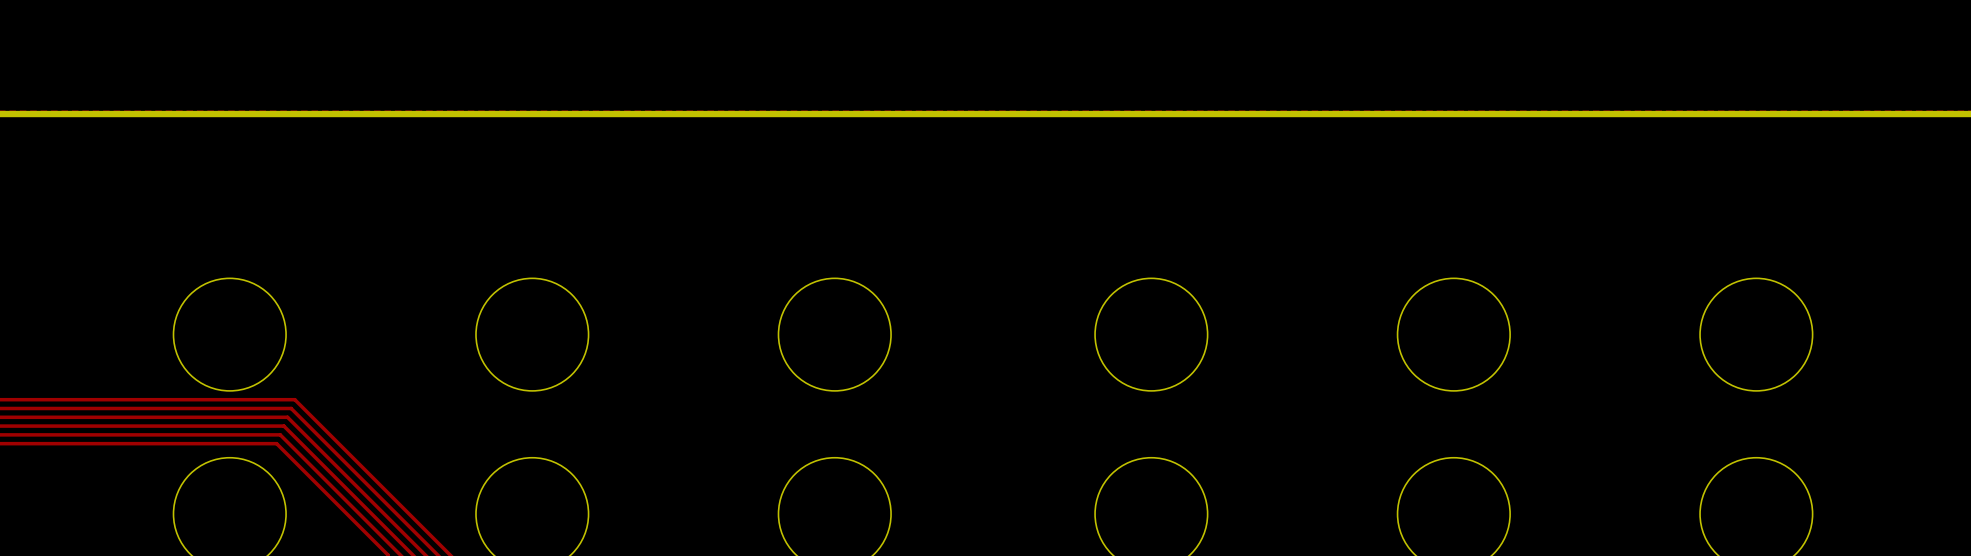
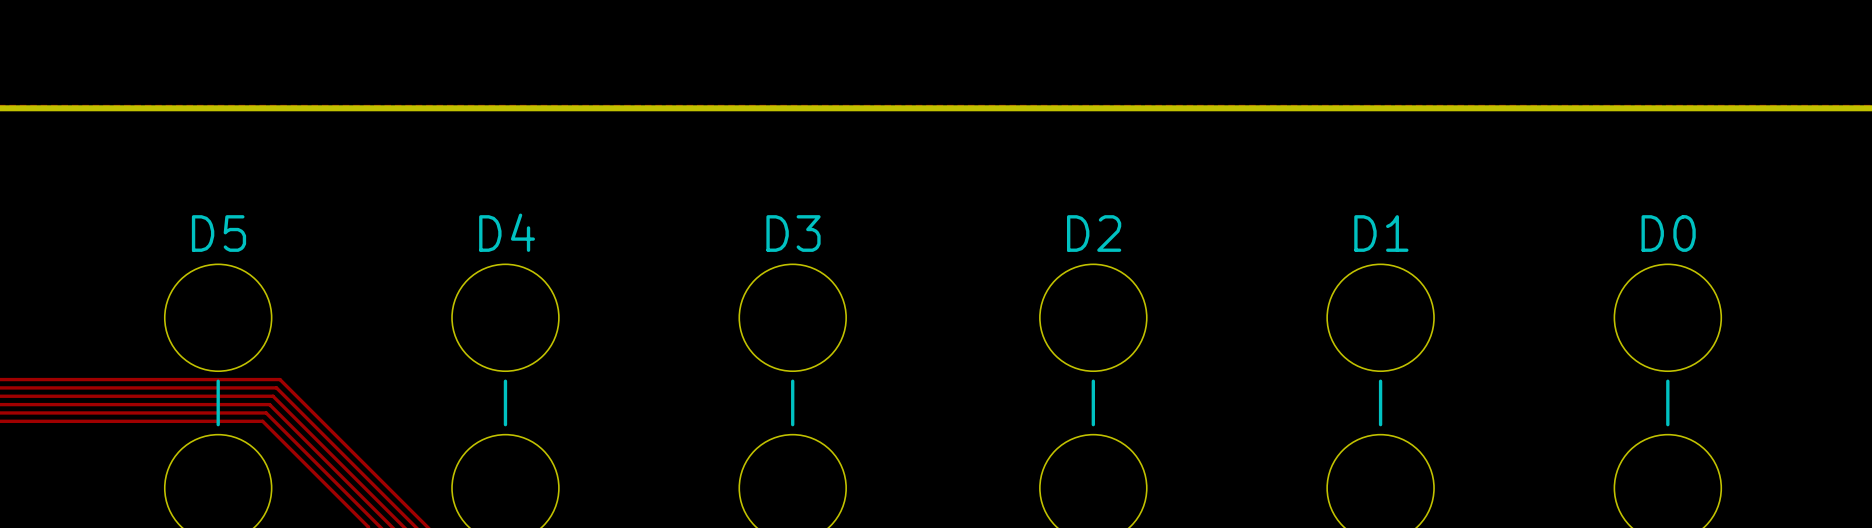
text: none -> D5 (218, 233)
text: none -> D4 (507, 232)
text: none -> D3 (793, 233)
text: none -> D2 (1094, 233)
text: none -> D1 (1381, 233)
text: none -> D0 (1668, 233)
line: none -> (218, 381) (218, 424)
line: none -> (505, 381) (505, 424)
line: none -> (792, 381) (792, 424)
line: none -> (1093, 381) (1093, 424)
line: none -> (1380, 381) (1380, 424)
line: none -> (1667, 381) (1667, 424)

